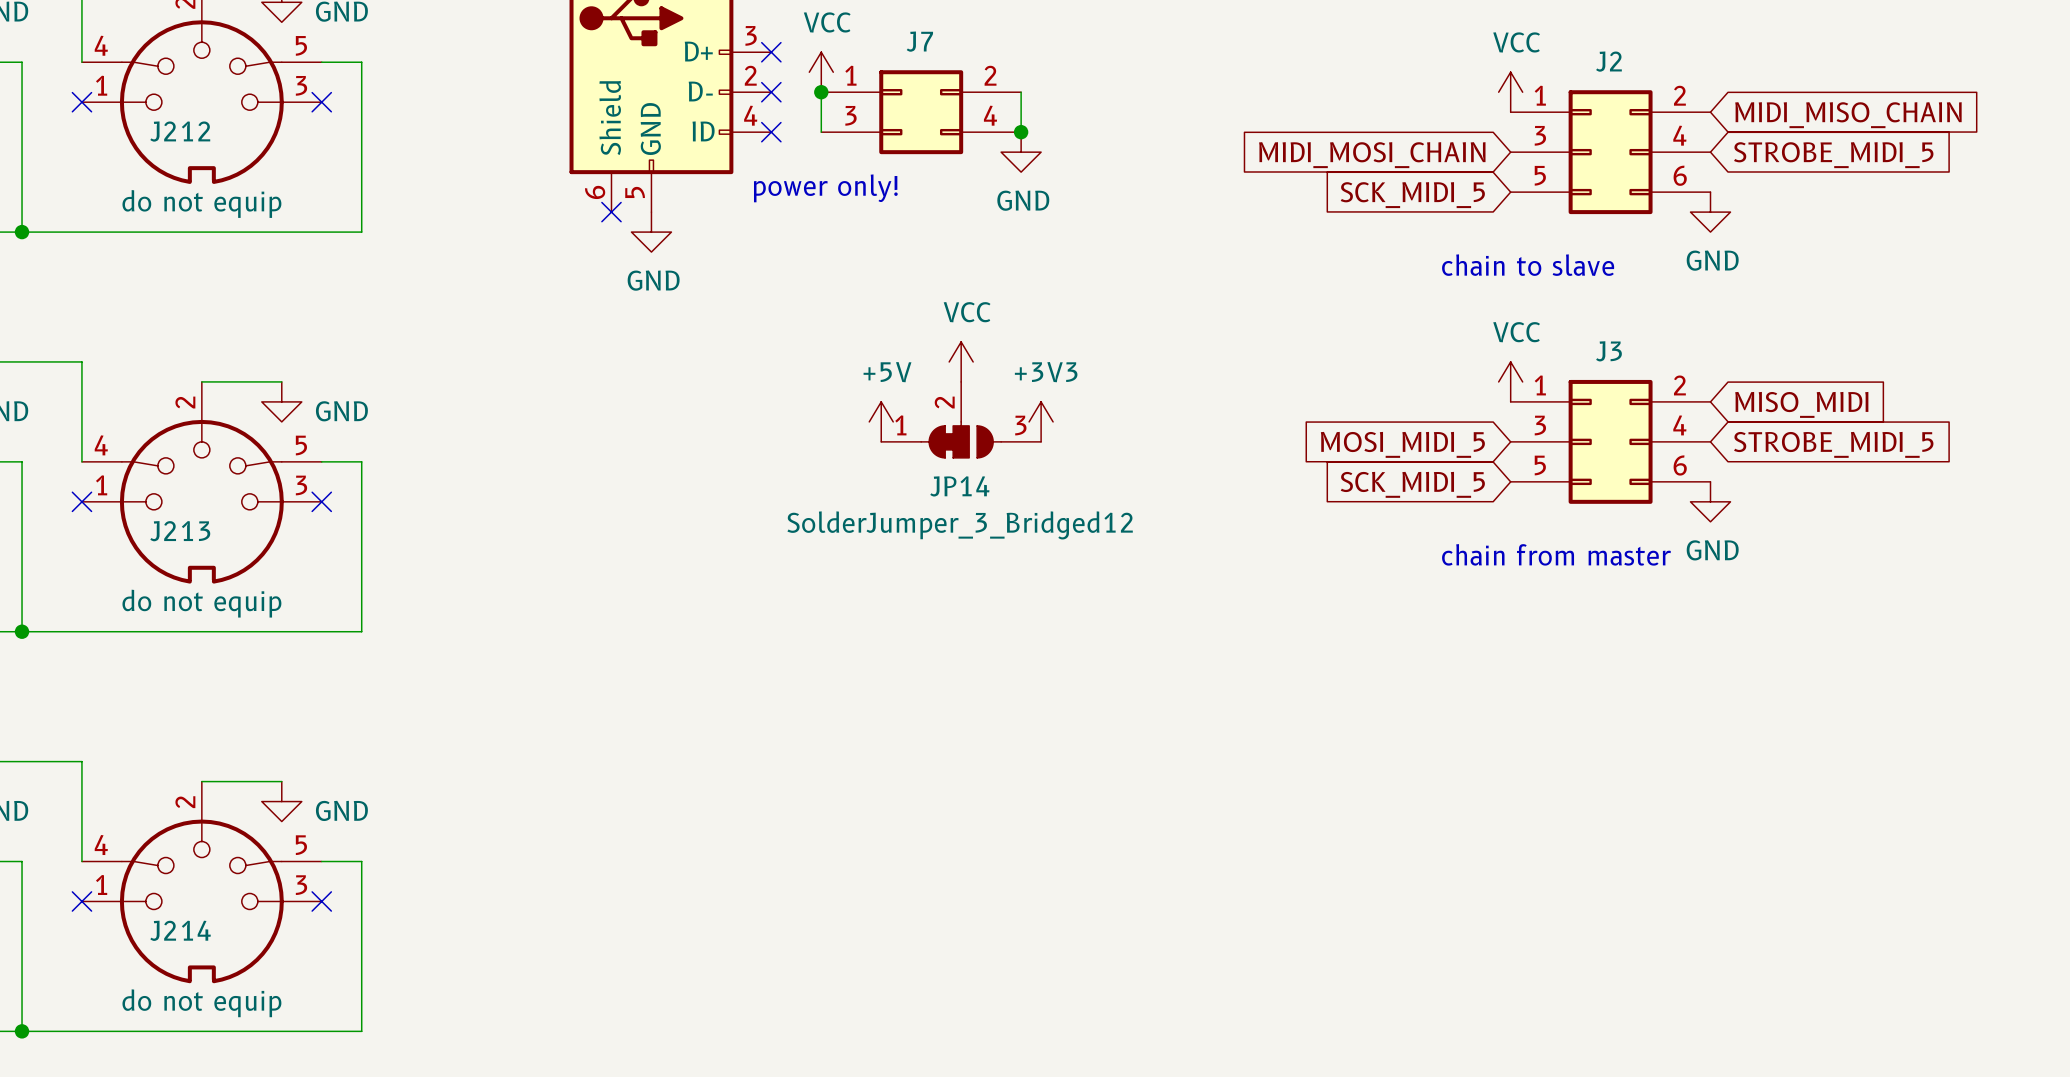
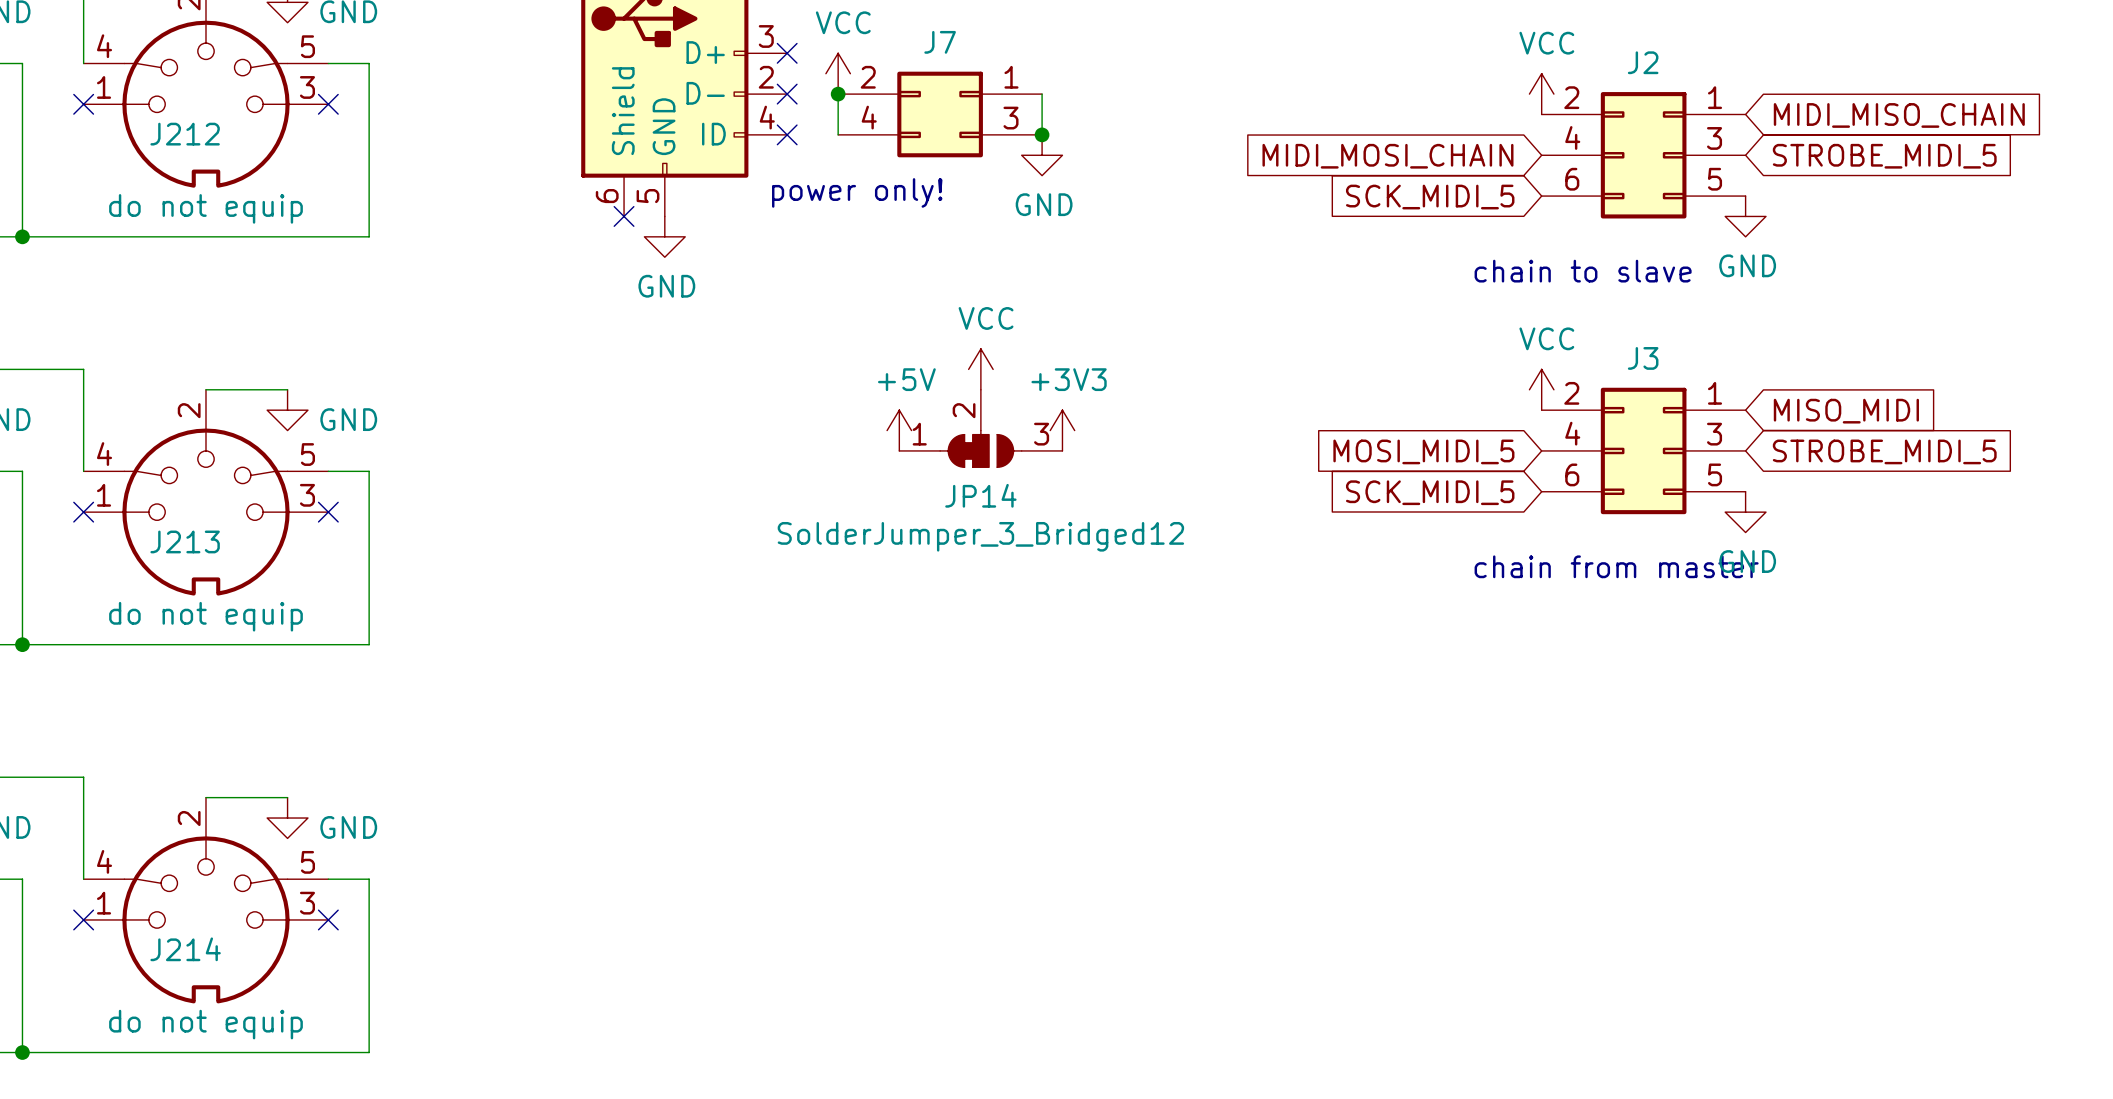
J7 flip: as is (921, 112) -> left-right (940, 114)
J2 flip: as is (1610, 152) -> left-right (1643, 155)
J3 flip: as is (1610, 441) -> left-right (1643, 450)

